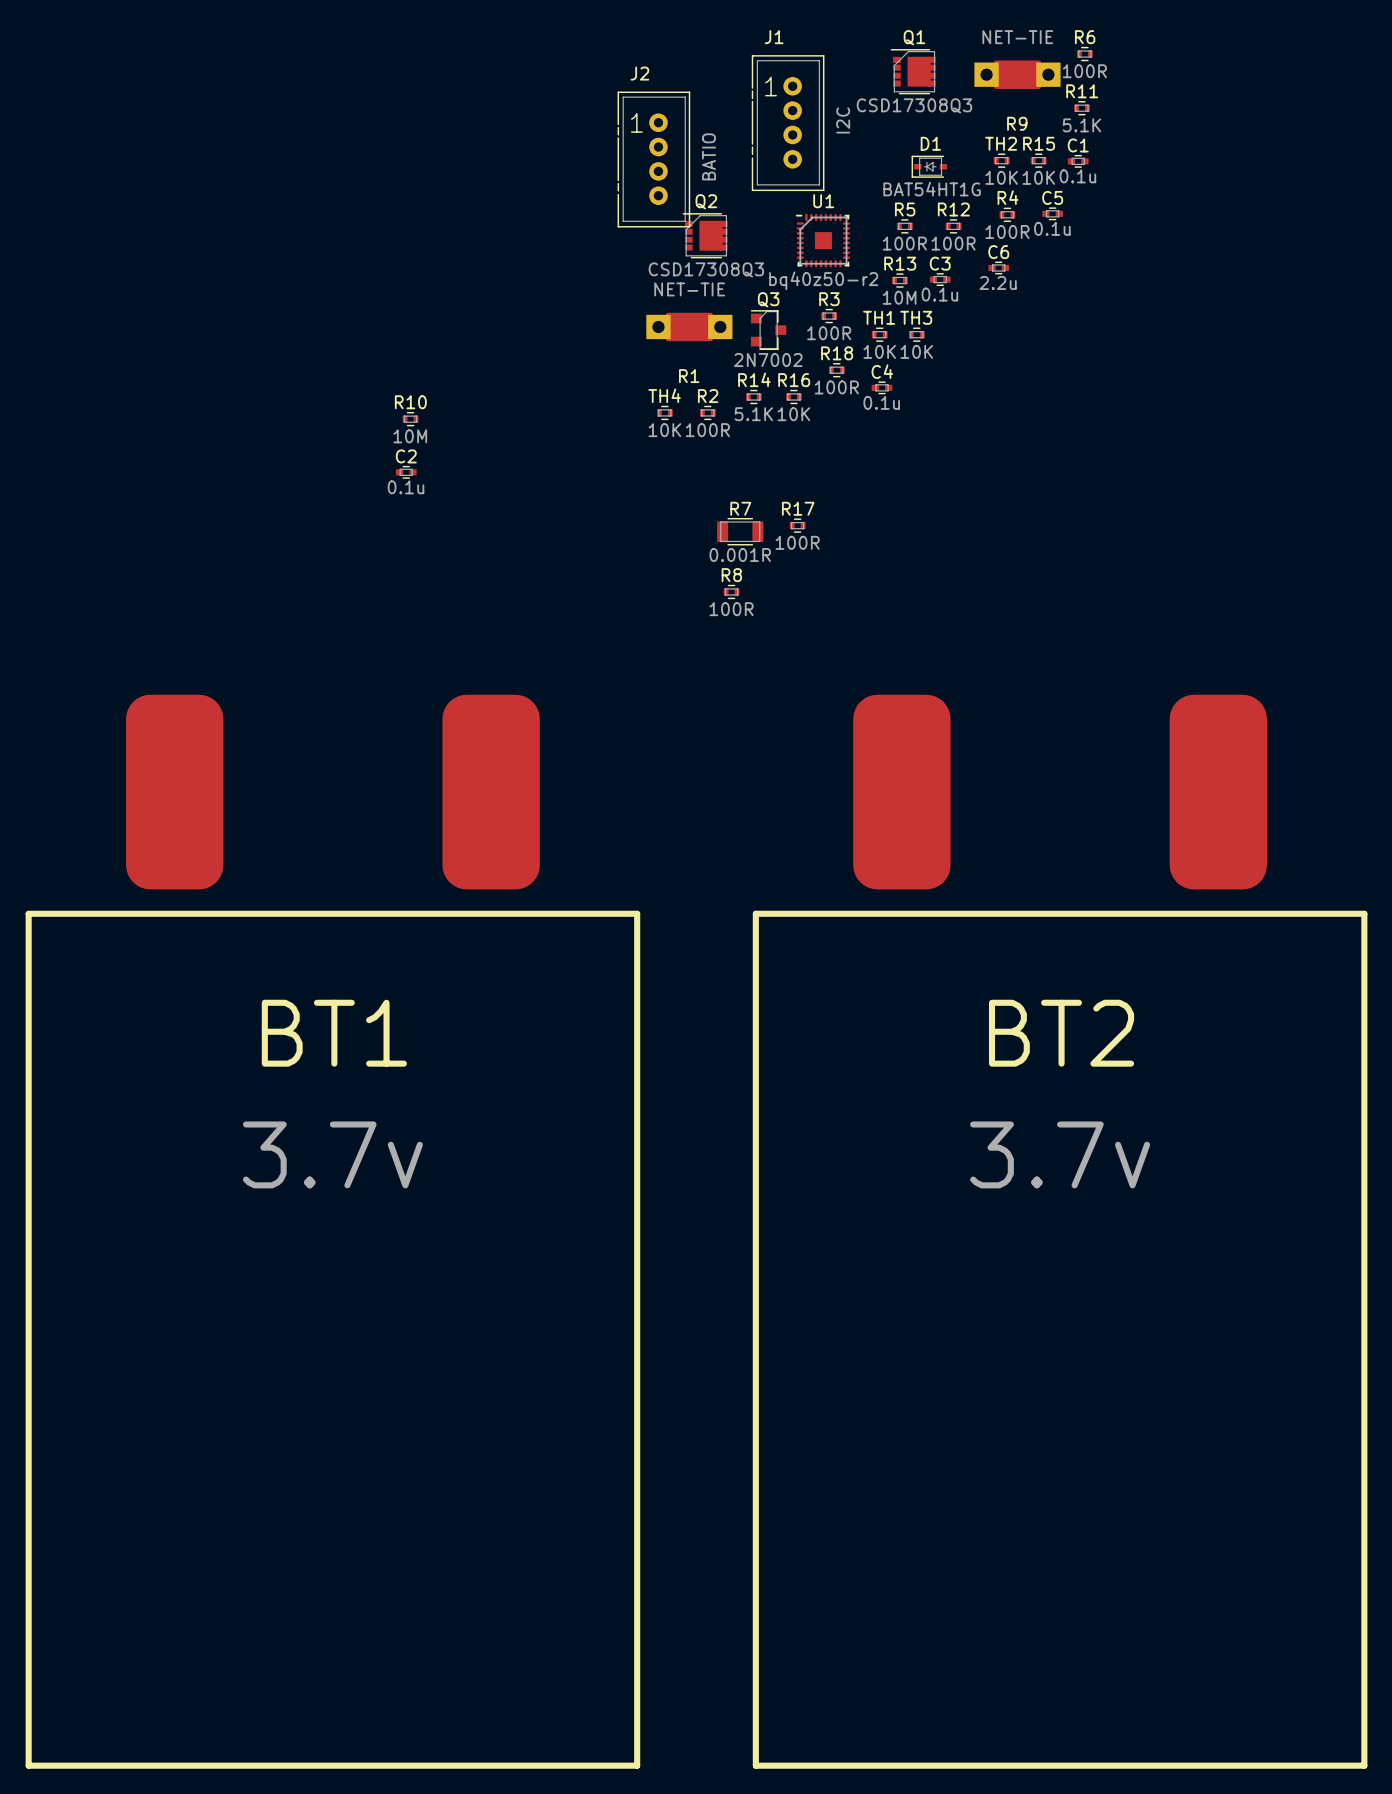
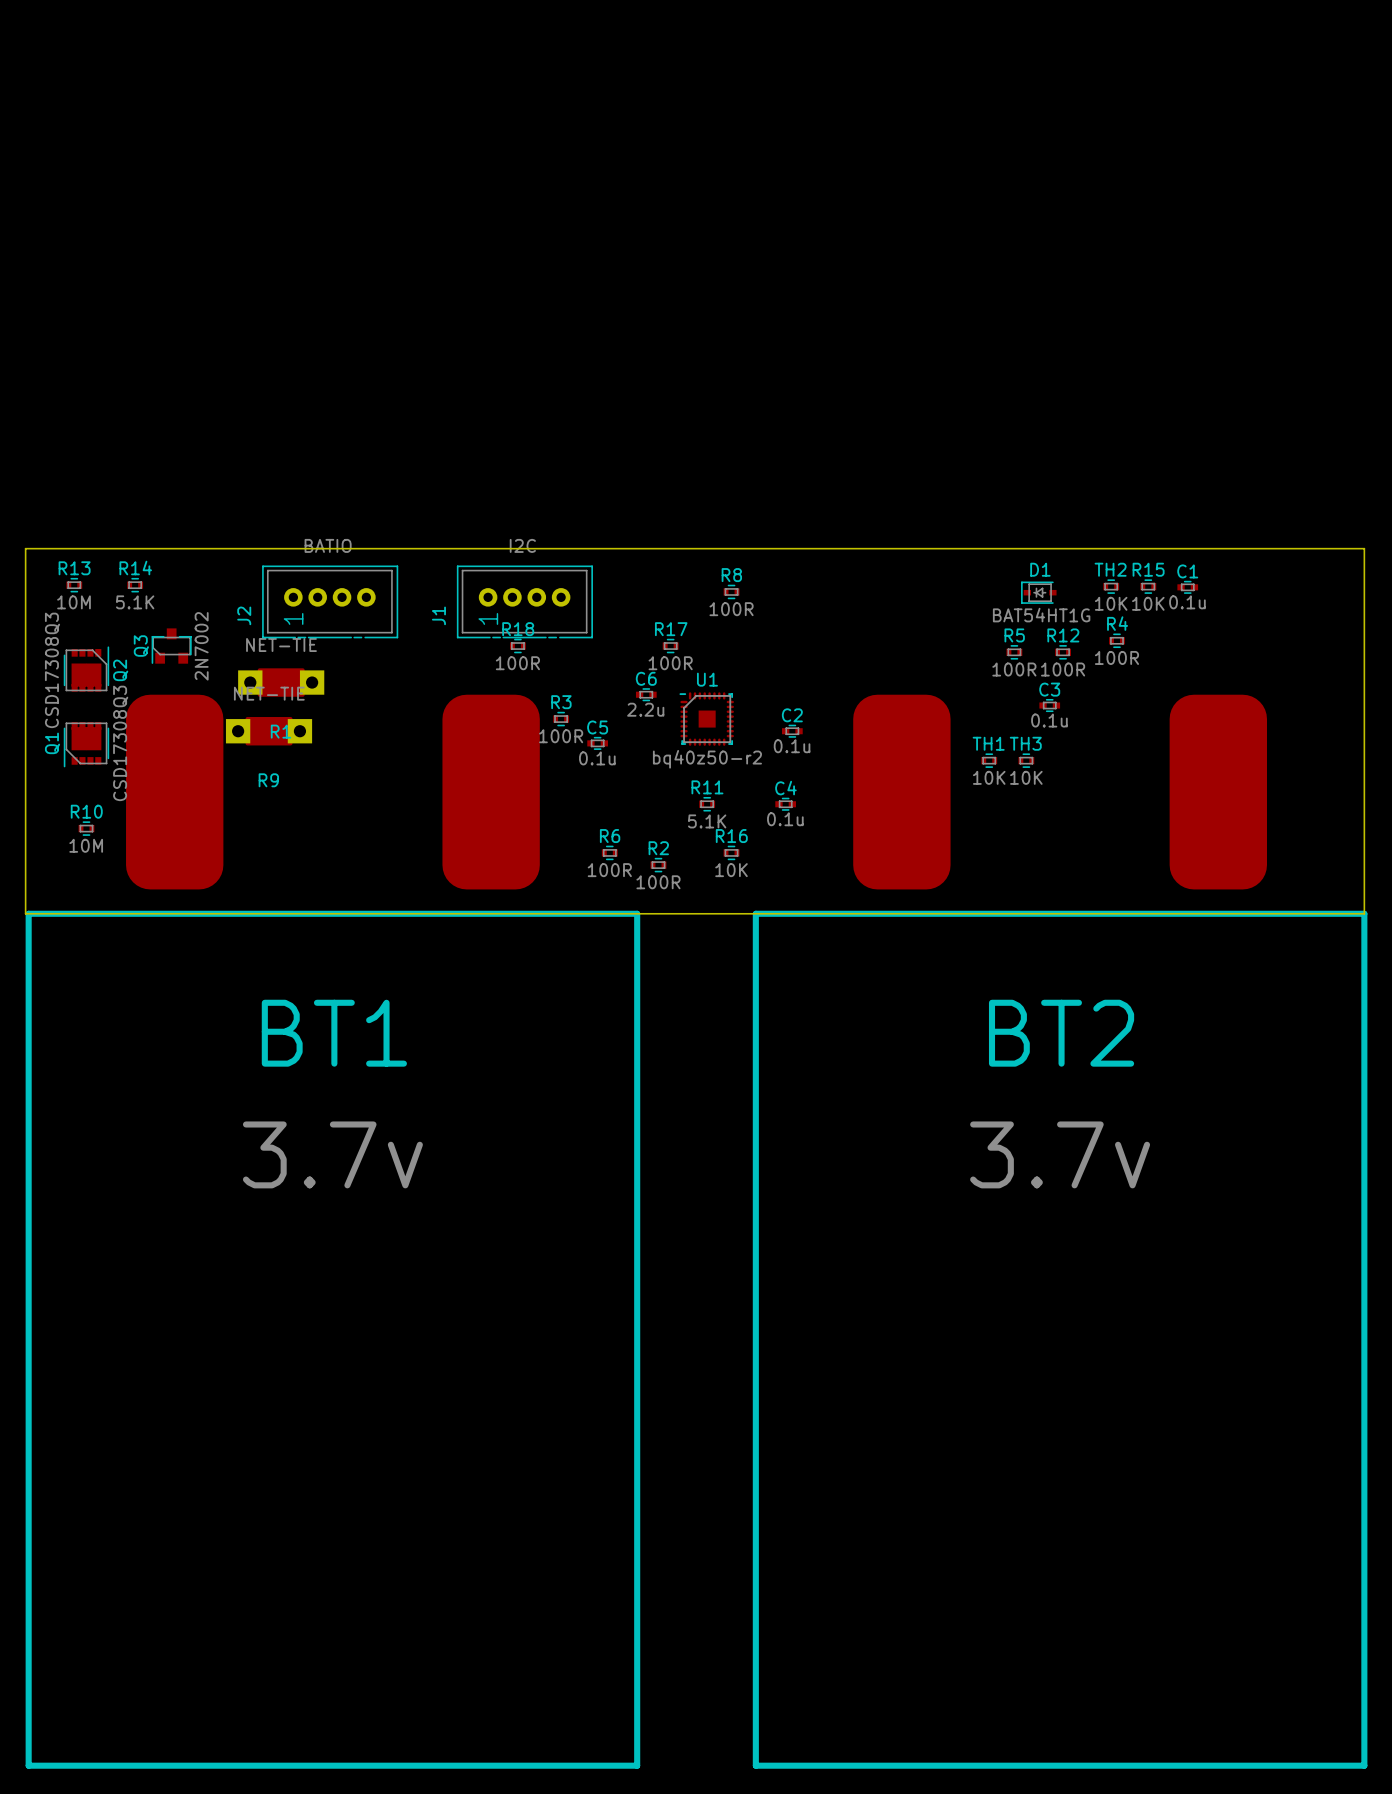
R6 position: (1084, 54) -> (609, 852)
Q1 rotation: 0° (913, 71) -> 90° counterclockwise (86, 744)
Q1 position: (913, 71) -> (86, 744)
R9 position: (1017, 74) -> (269, 731)
R11 position: (1081, 108) -> (707, 804)
J1 rotation: 0° (788, 123) -> 90° counterclockwise (524, 601)
J1 position: (788, 123) -> (524, 601)
J2 rotation: 0° (653, 159) -> 90° counterclockwise (330, 601)
J2 position: (653, 159) -> (330, 601)
TH2 position: (1001, 160) -> (1111, 586)
R15 position: (1038, 160) -> (1148, 586)
C1 position: (1078, 161) -> (1187, 587)
D1 position: (929, 166) -> (1038, 592)
C5 position: (1052, 213) -> (597, 743)
R4 position: (1007, 214) -> (1116, 640)
R5 position: (904, 226) -> (1014, 652)
R12 position: (953, 226) -> (1063, 652)
Q2 rotation: 0° (705, 235) -> 90° clockwise (86, 669)
Q2 position: (705, 235) -> (86, 669)
U1 position: (822, 240) -> (706, 719)
C6 position: (998, 267) -> (646, 694)
C3 position: (940, 279) -> (1049, 705)
R13 position: (899, 280) -> (74, 585)
R3 position: (829, 316) -> (561, 719)
R1 position: (689, 326) -> (281, 682)
Q3 rotation: 0° (768, 330) -> 90° counterclockwise (171, 646)
Q3 position: (768, 330) -> (171, 646)
TH1 position: (879, 334) -> (989, 760)
TH3 position: (916, 334) -> (1026, 760)
R18 position: (836, 370) -> (517, 646)
C4 position: (882, 387) -> (785, 804)
R14 position: (753, 397) -> (135, 585)
R16 position: (793, 397) -> (731, 852)
TH4: 10K (664, 412) -> none
R2 position: (707, 412) -> (658, 865)
R10 position: (410, 419) -> (86, 828)
C2 position: (406, 472) -> (792, 731)
R17 position: (797, 525) -> (670, 646)
R7: 0.001R (740, 531) -> none
board edge: none -> (25, 548) (1364, 548) (1364, 913) (25, 913) (25, 548)

